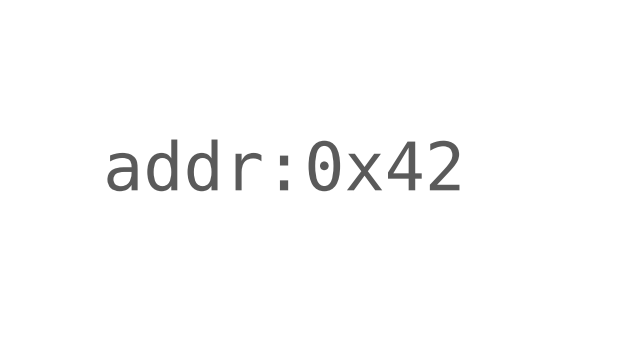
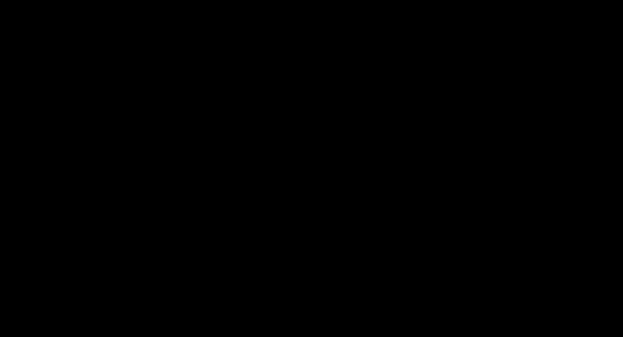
text: addr:0x42 (283, 165) -> none

